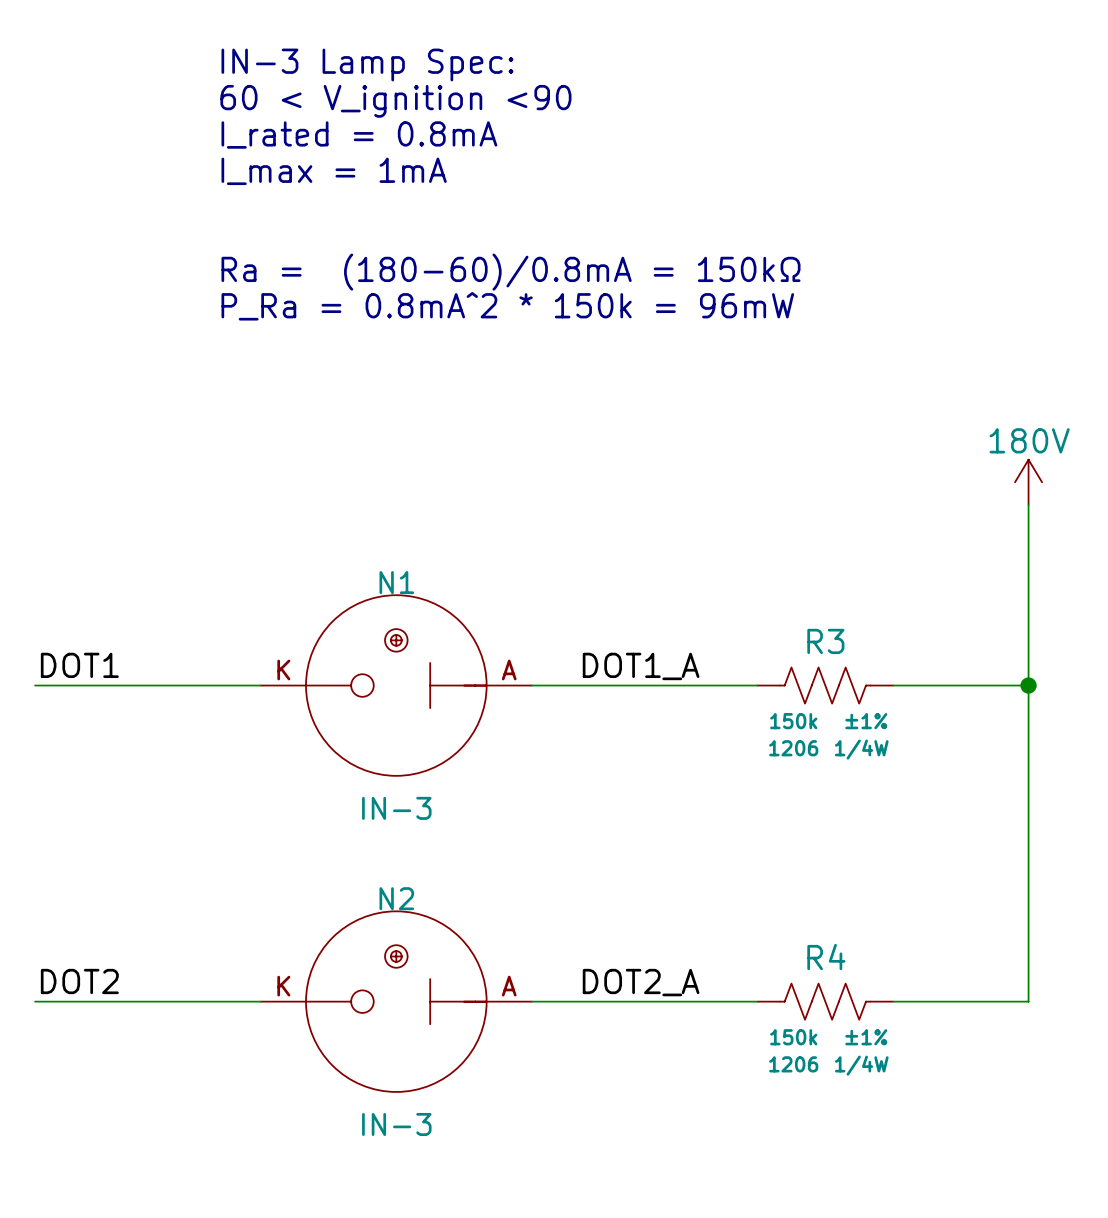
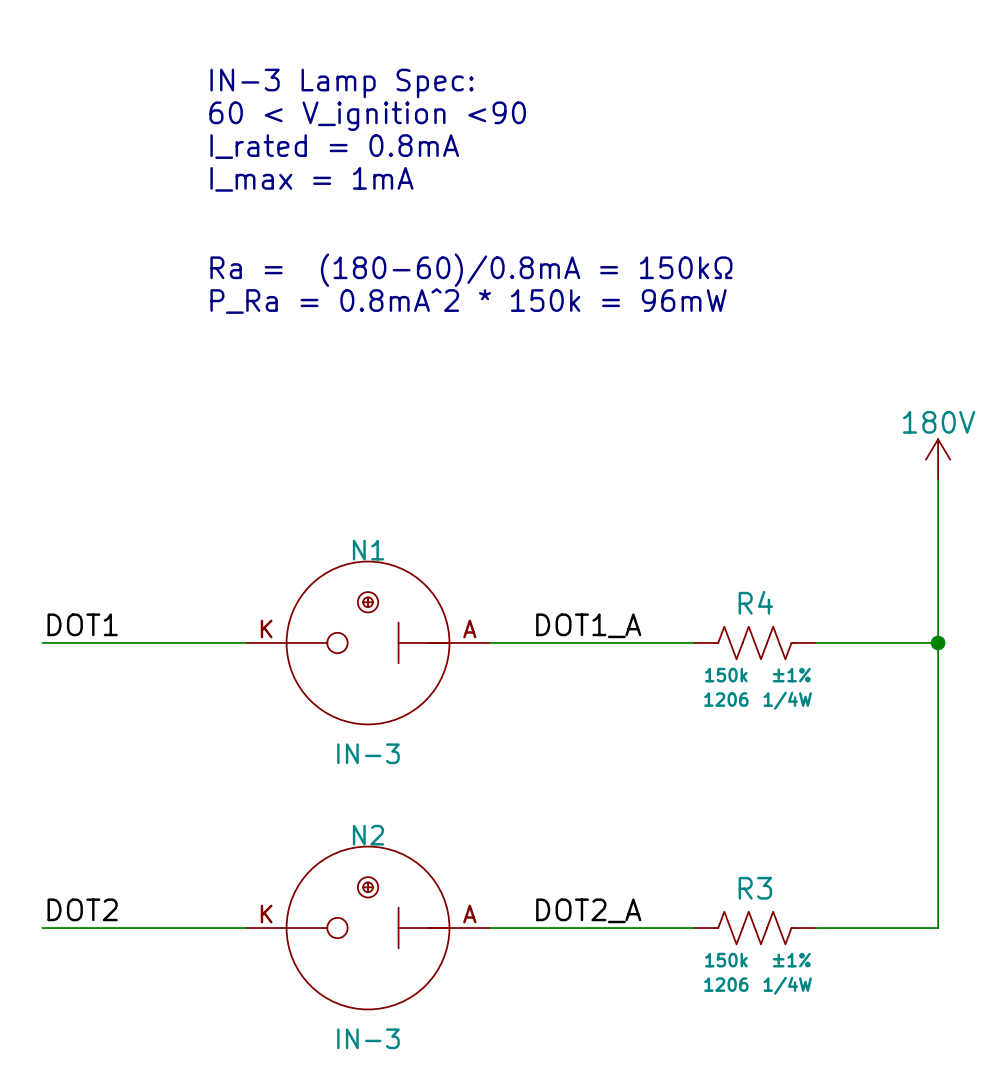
R3 name: R3 (825, 641) -> R4 (755, 602)
R4 name: R4 (826, 957) -> R3 (755, 888)

